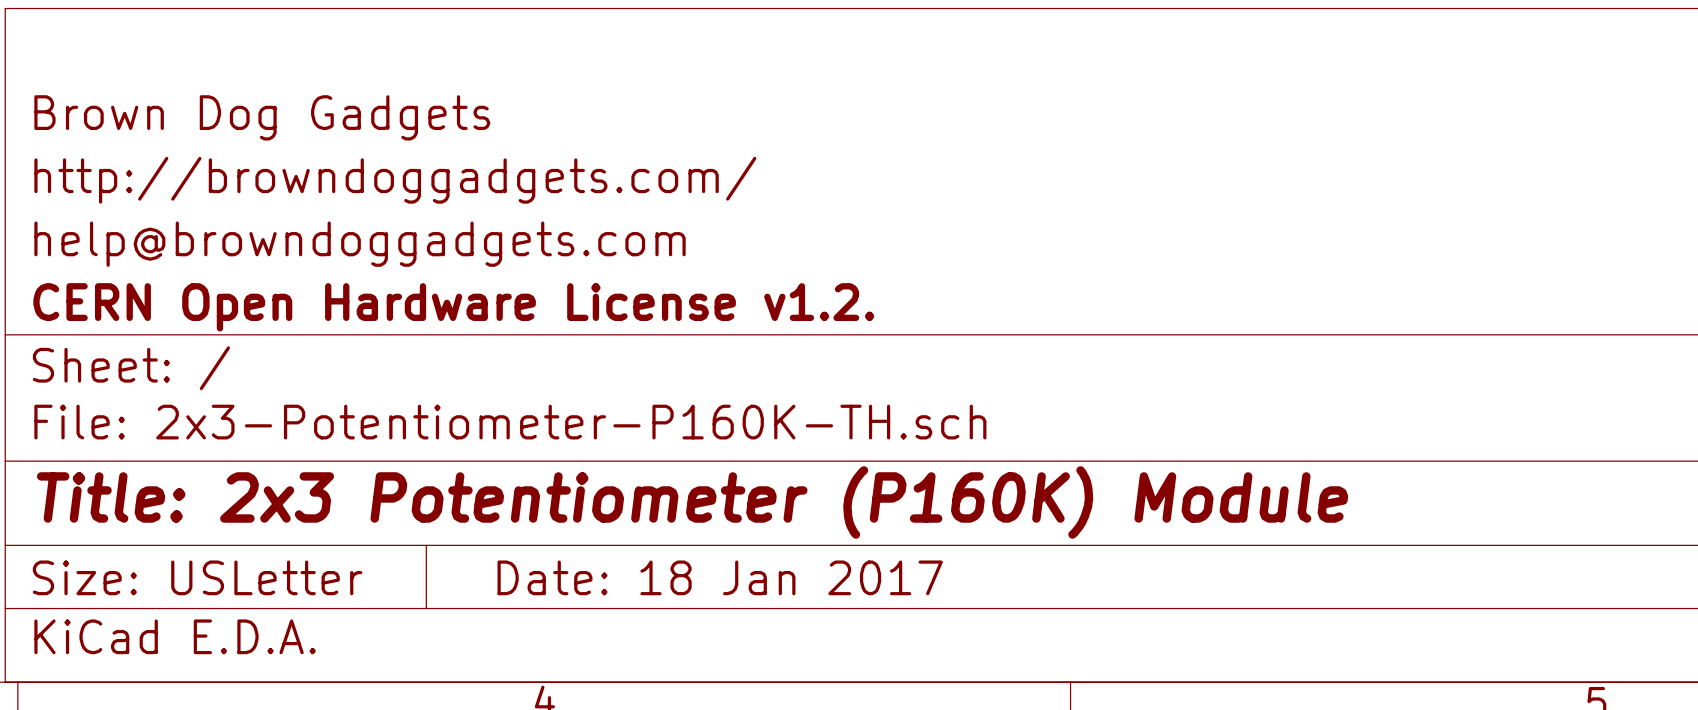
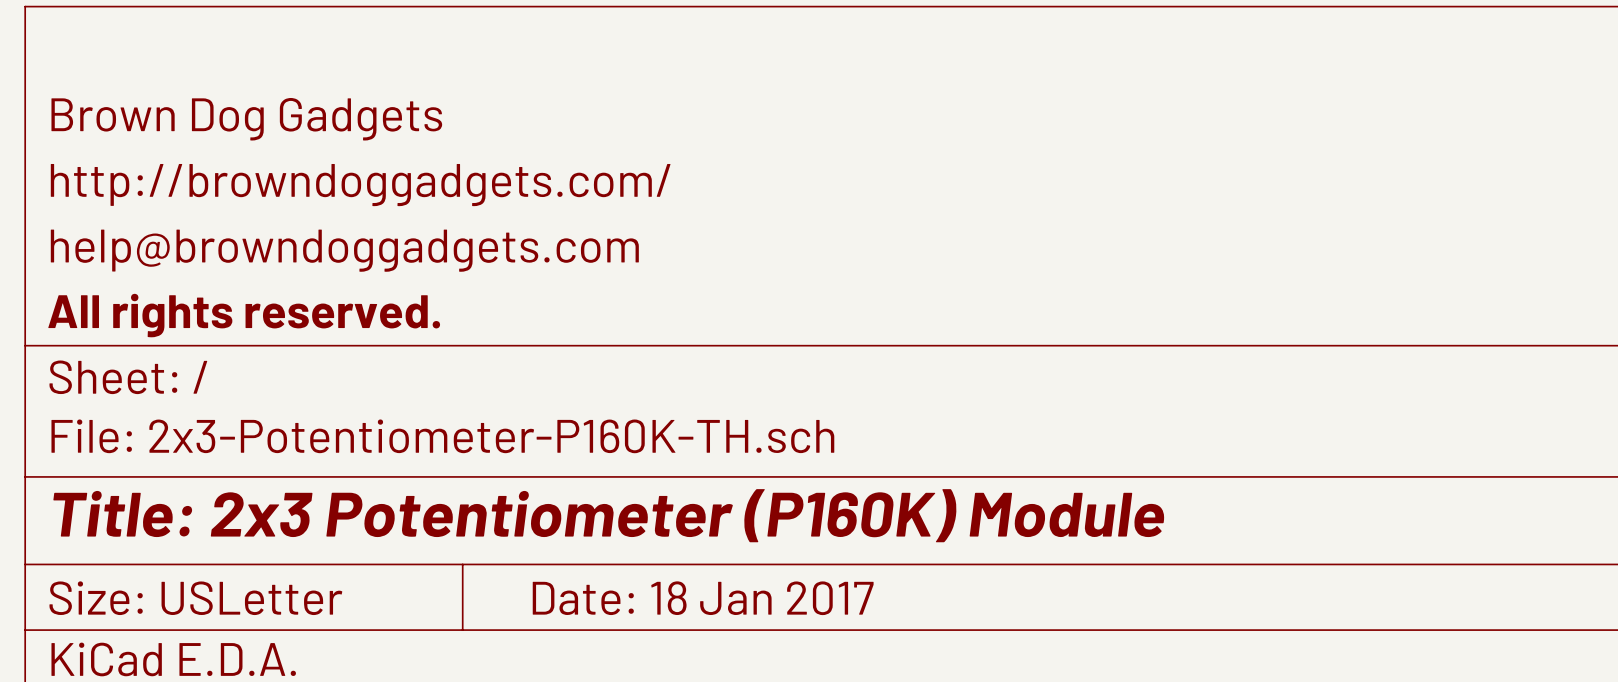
title block: CERN Open Hardware License v1.2. (453, 307) -> All rights reserved. (244, 315)

